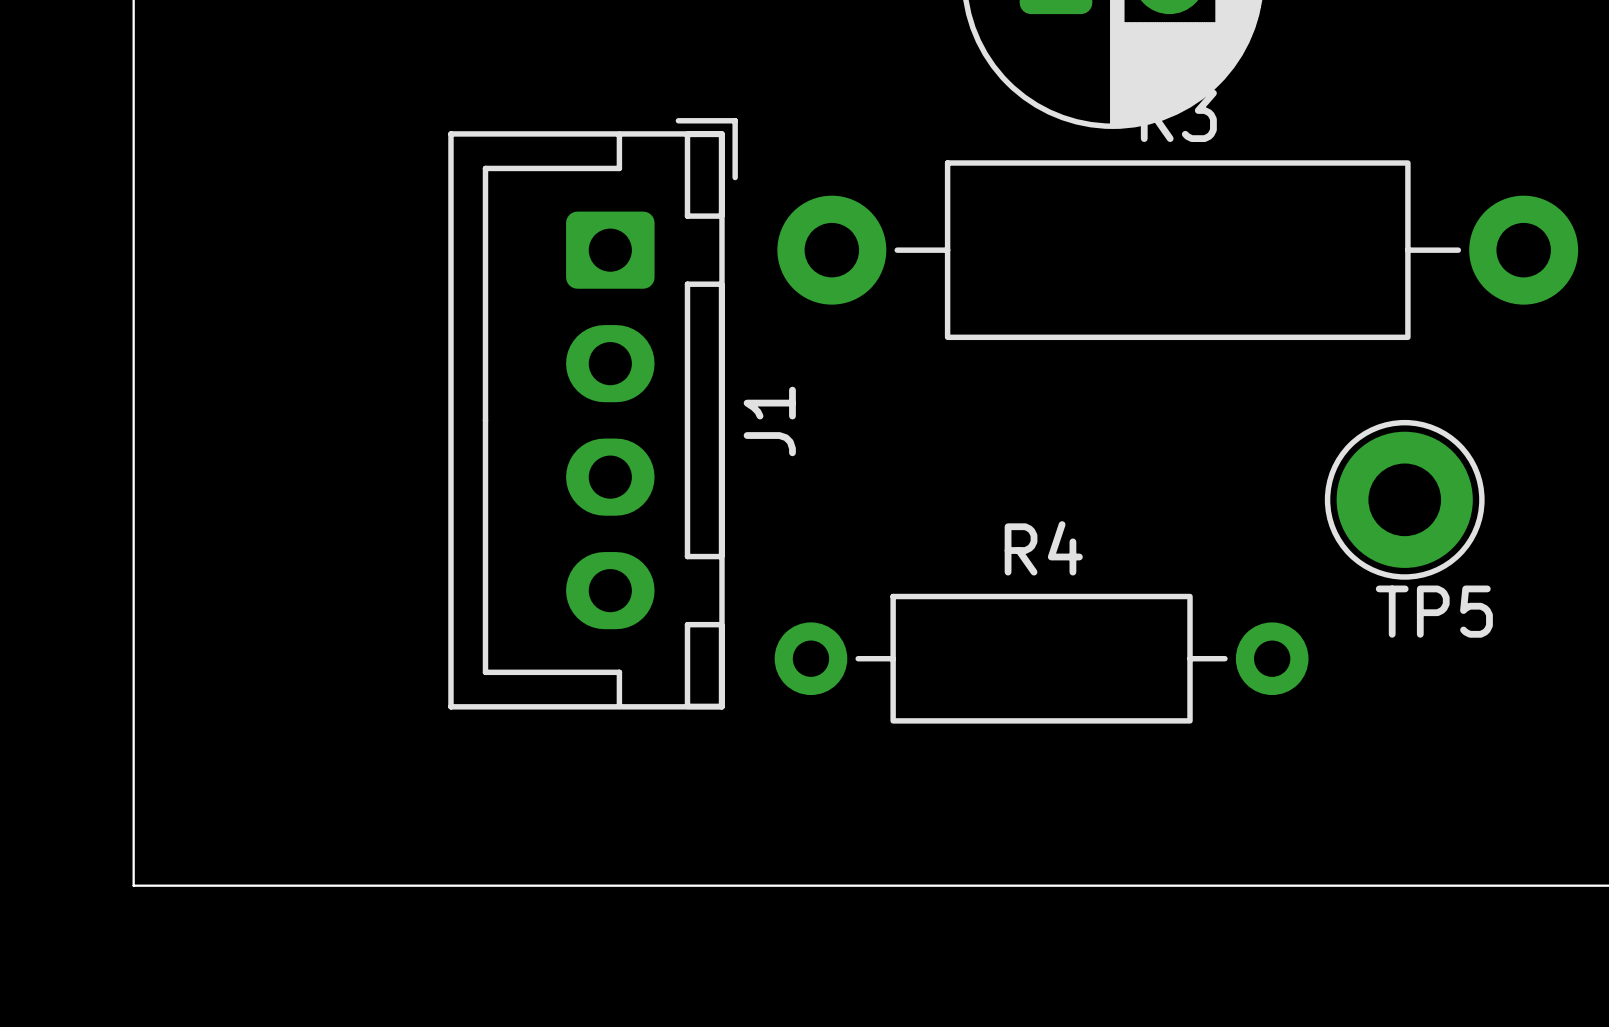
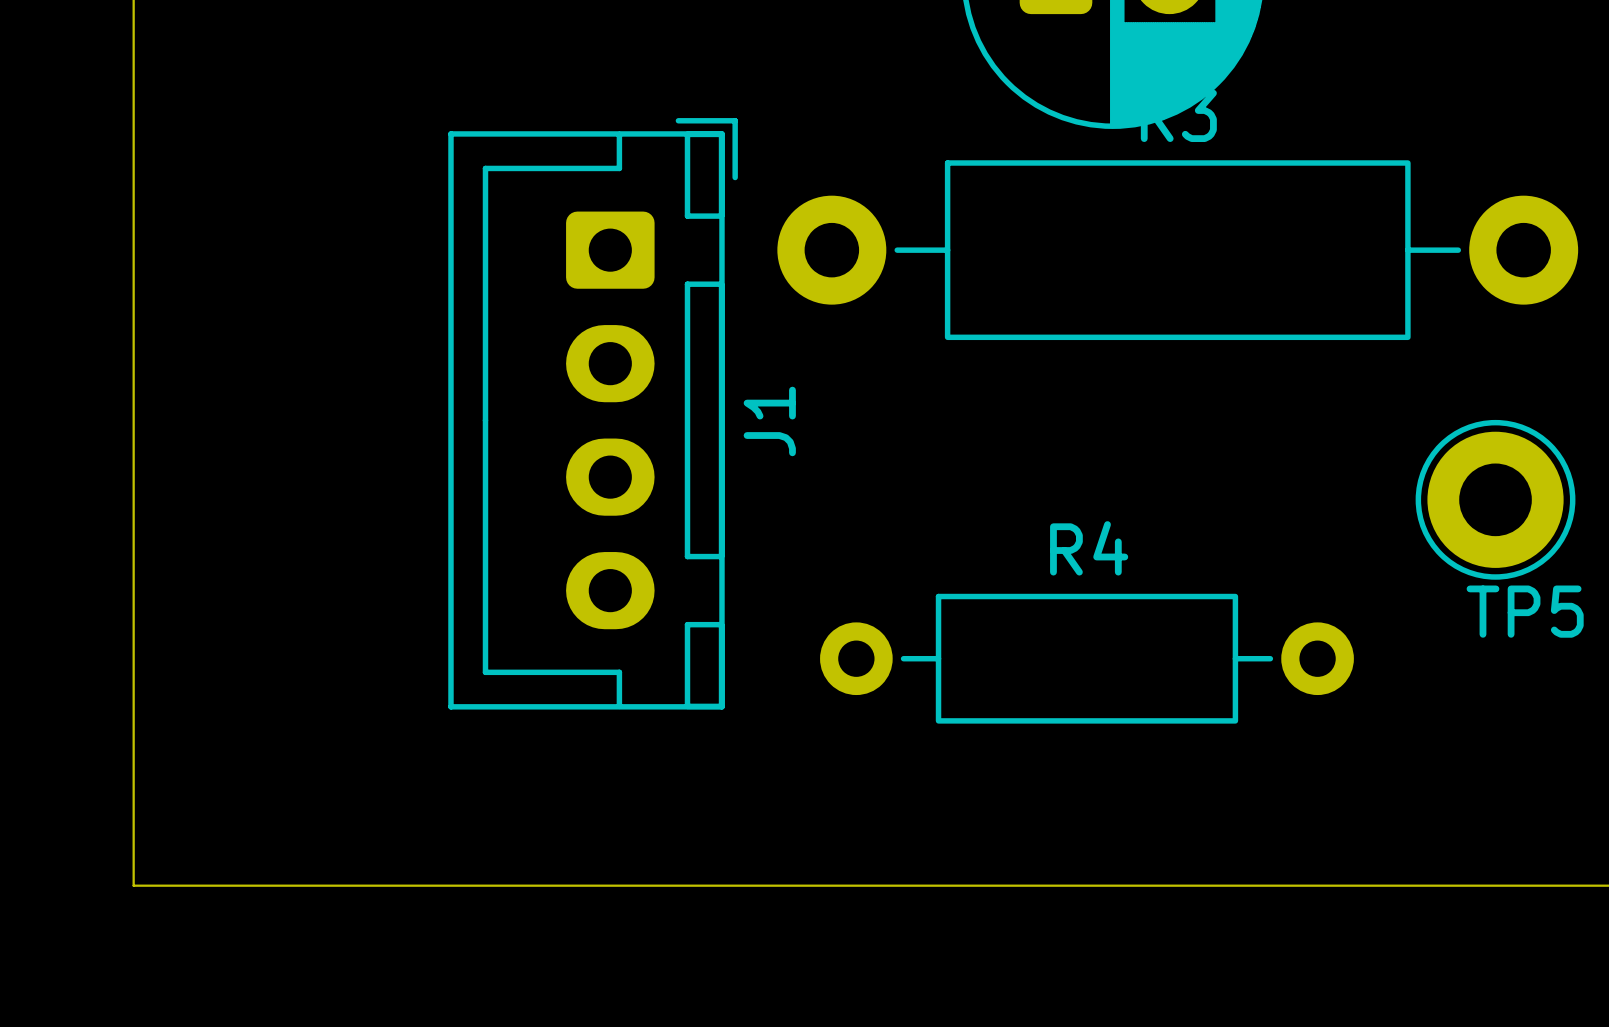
TP5 position: (1404, 499) -> (1495, 499)
R4 position: (1041, 658) -> (1086, 658)

